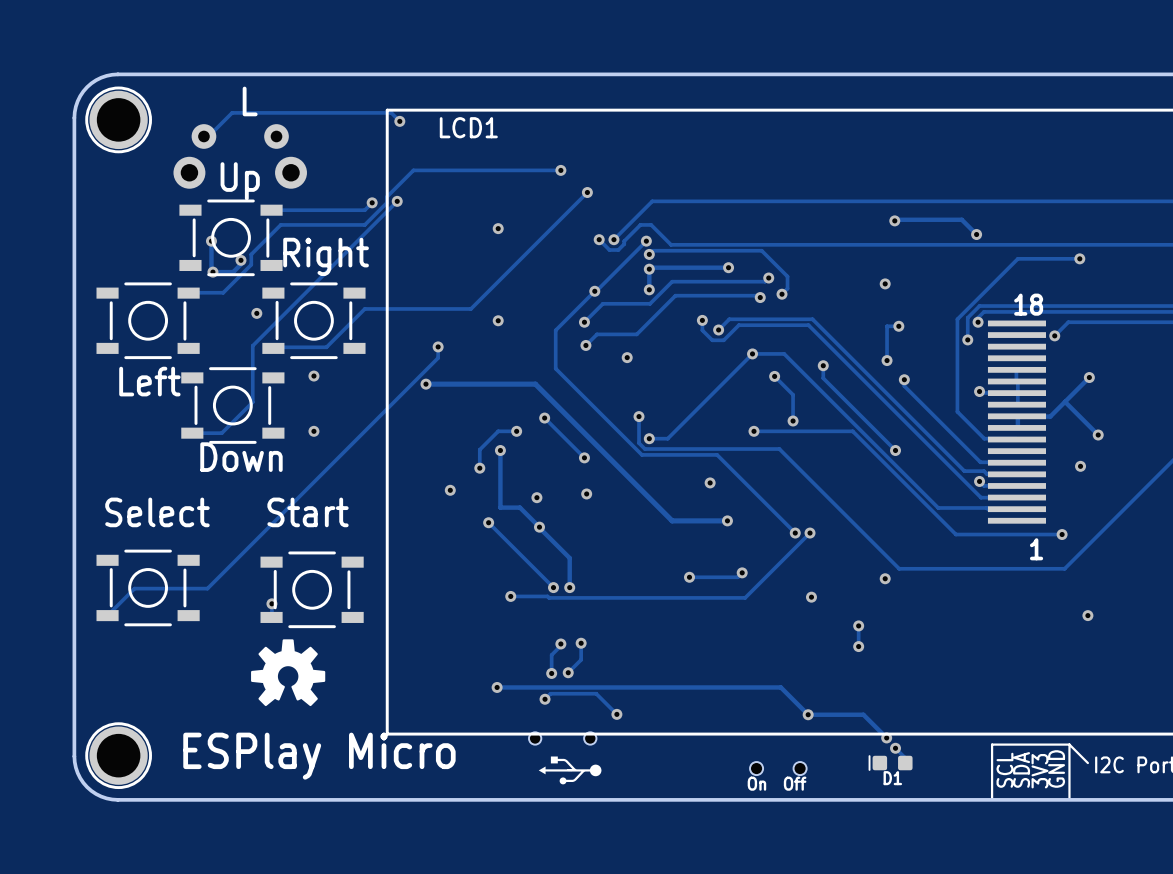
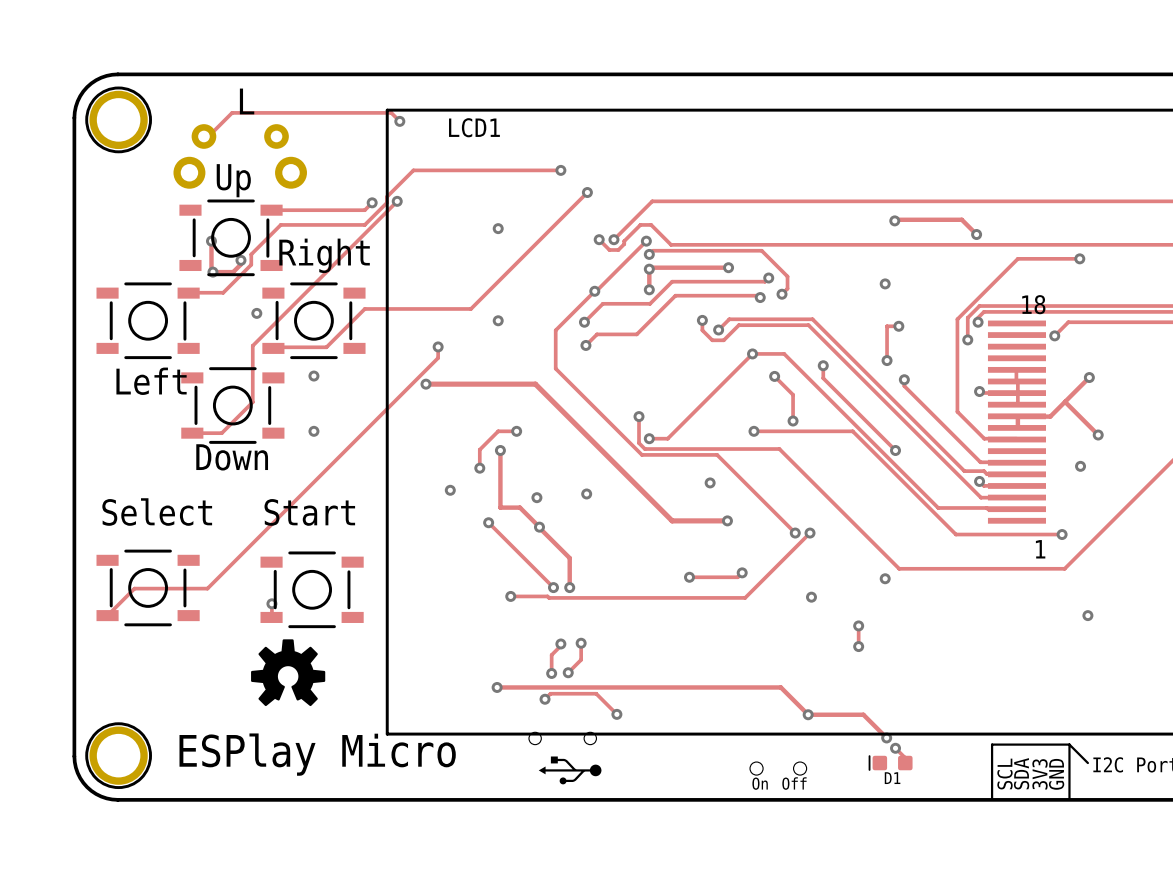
via: (627, 357) -> none
track: (544, 418) (584, 457) -> none
via: (544, 418) -> none
via: (584, 457) -> none

